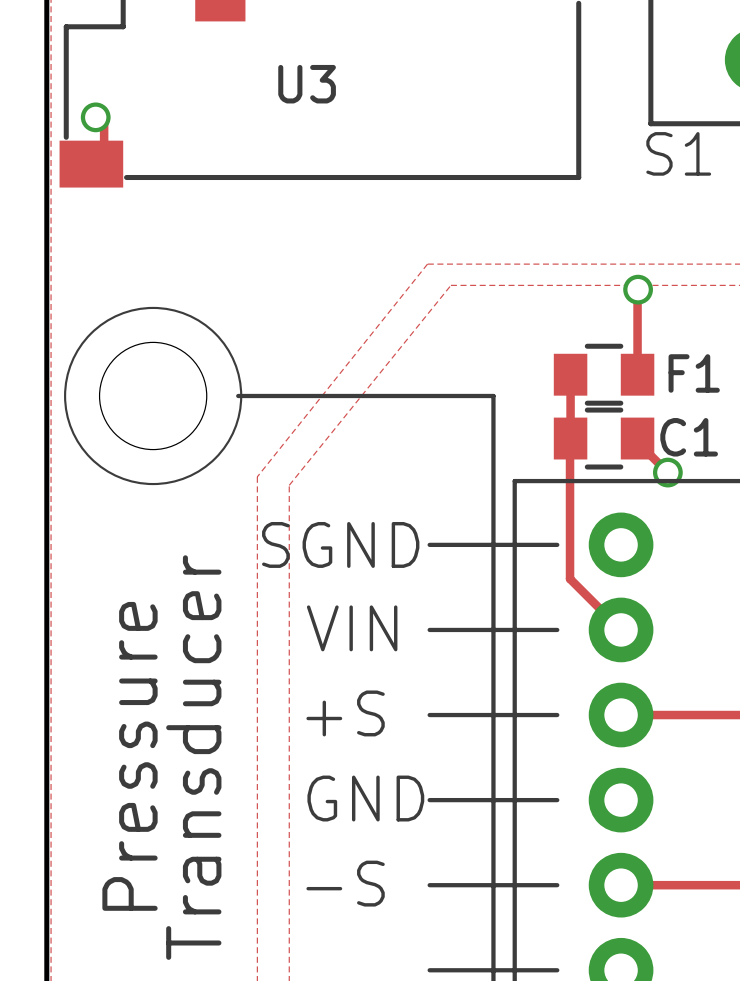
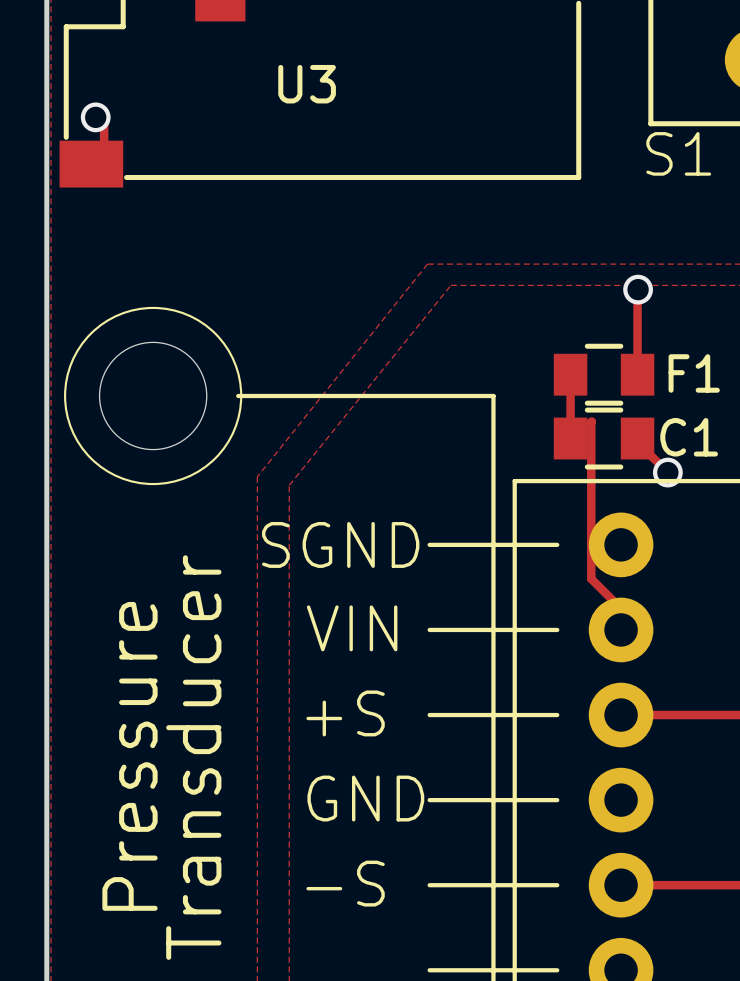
track: (570, 421) (570, 578) (621, 629) -> (591, 421) (591, 578) (642, 629)

